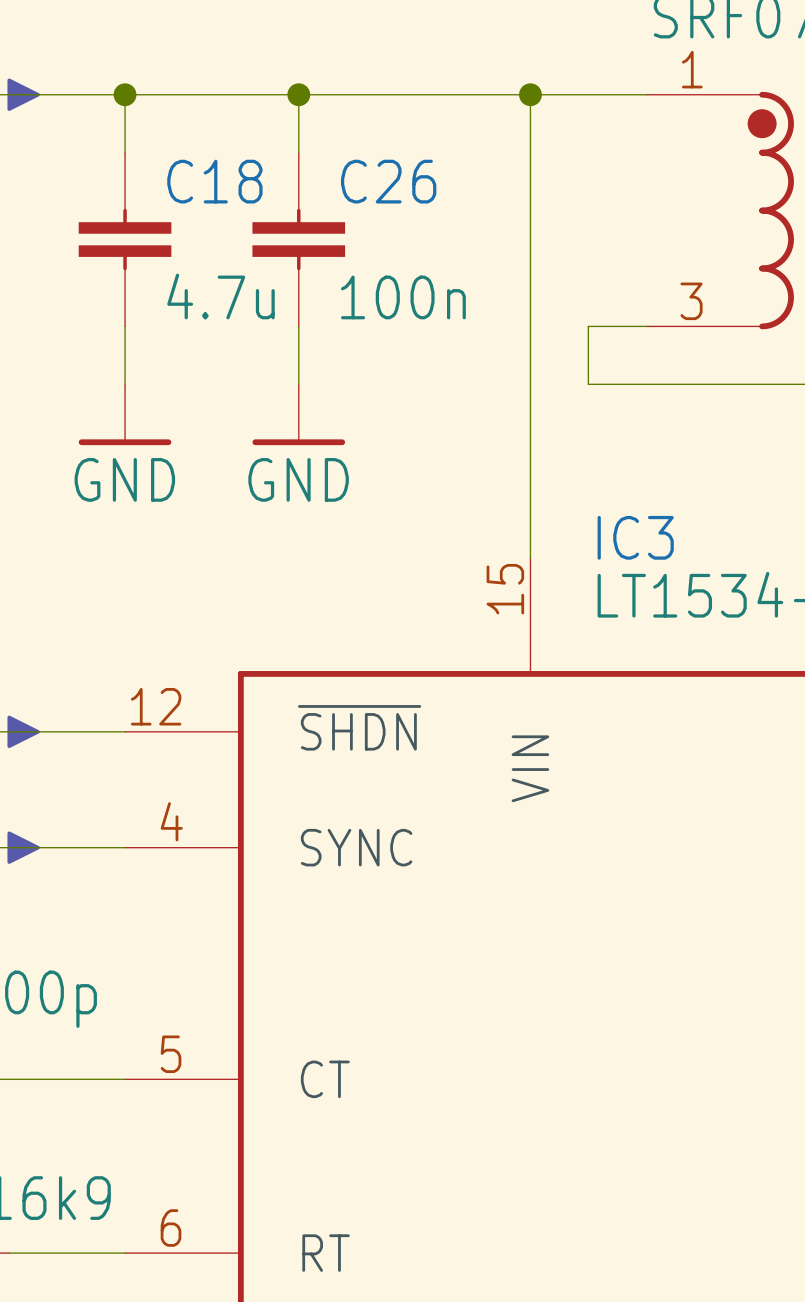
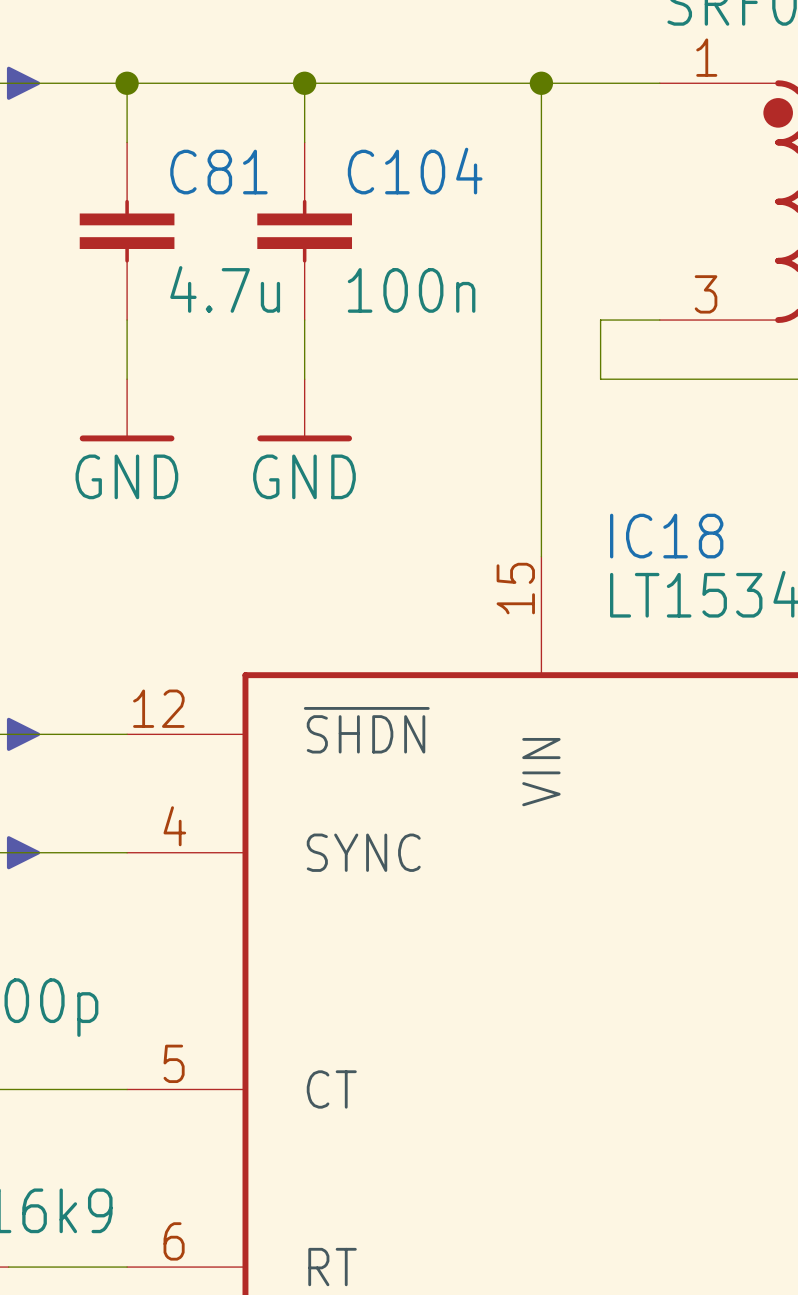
C18 name: C18 (214, 181) -> C81 (218, 172)
C26 name: C26 (388, 181) -> C104 (415, 171)
IC3 name: IC3 (635, 537) -> IC18 (666, 536)

